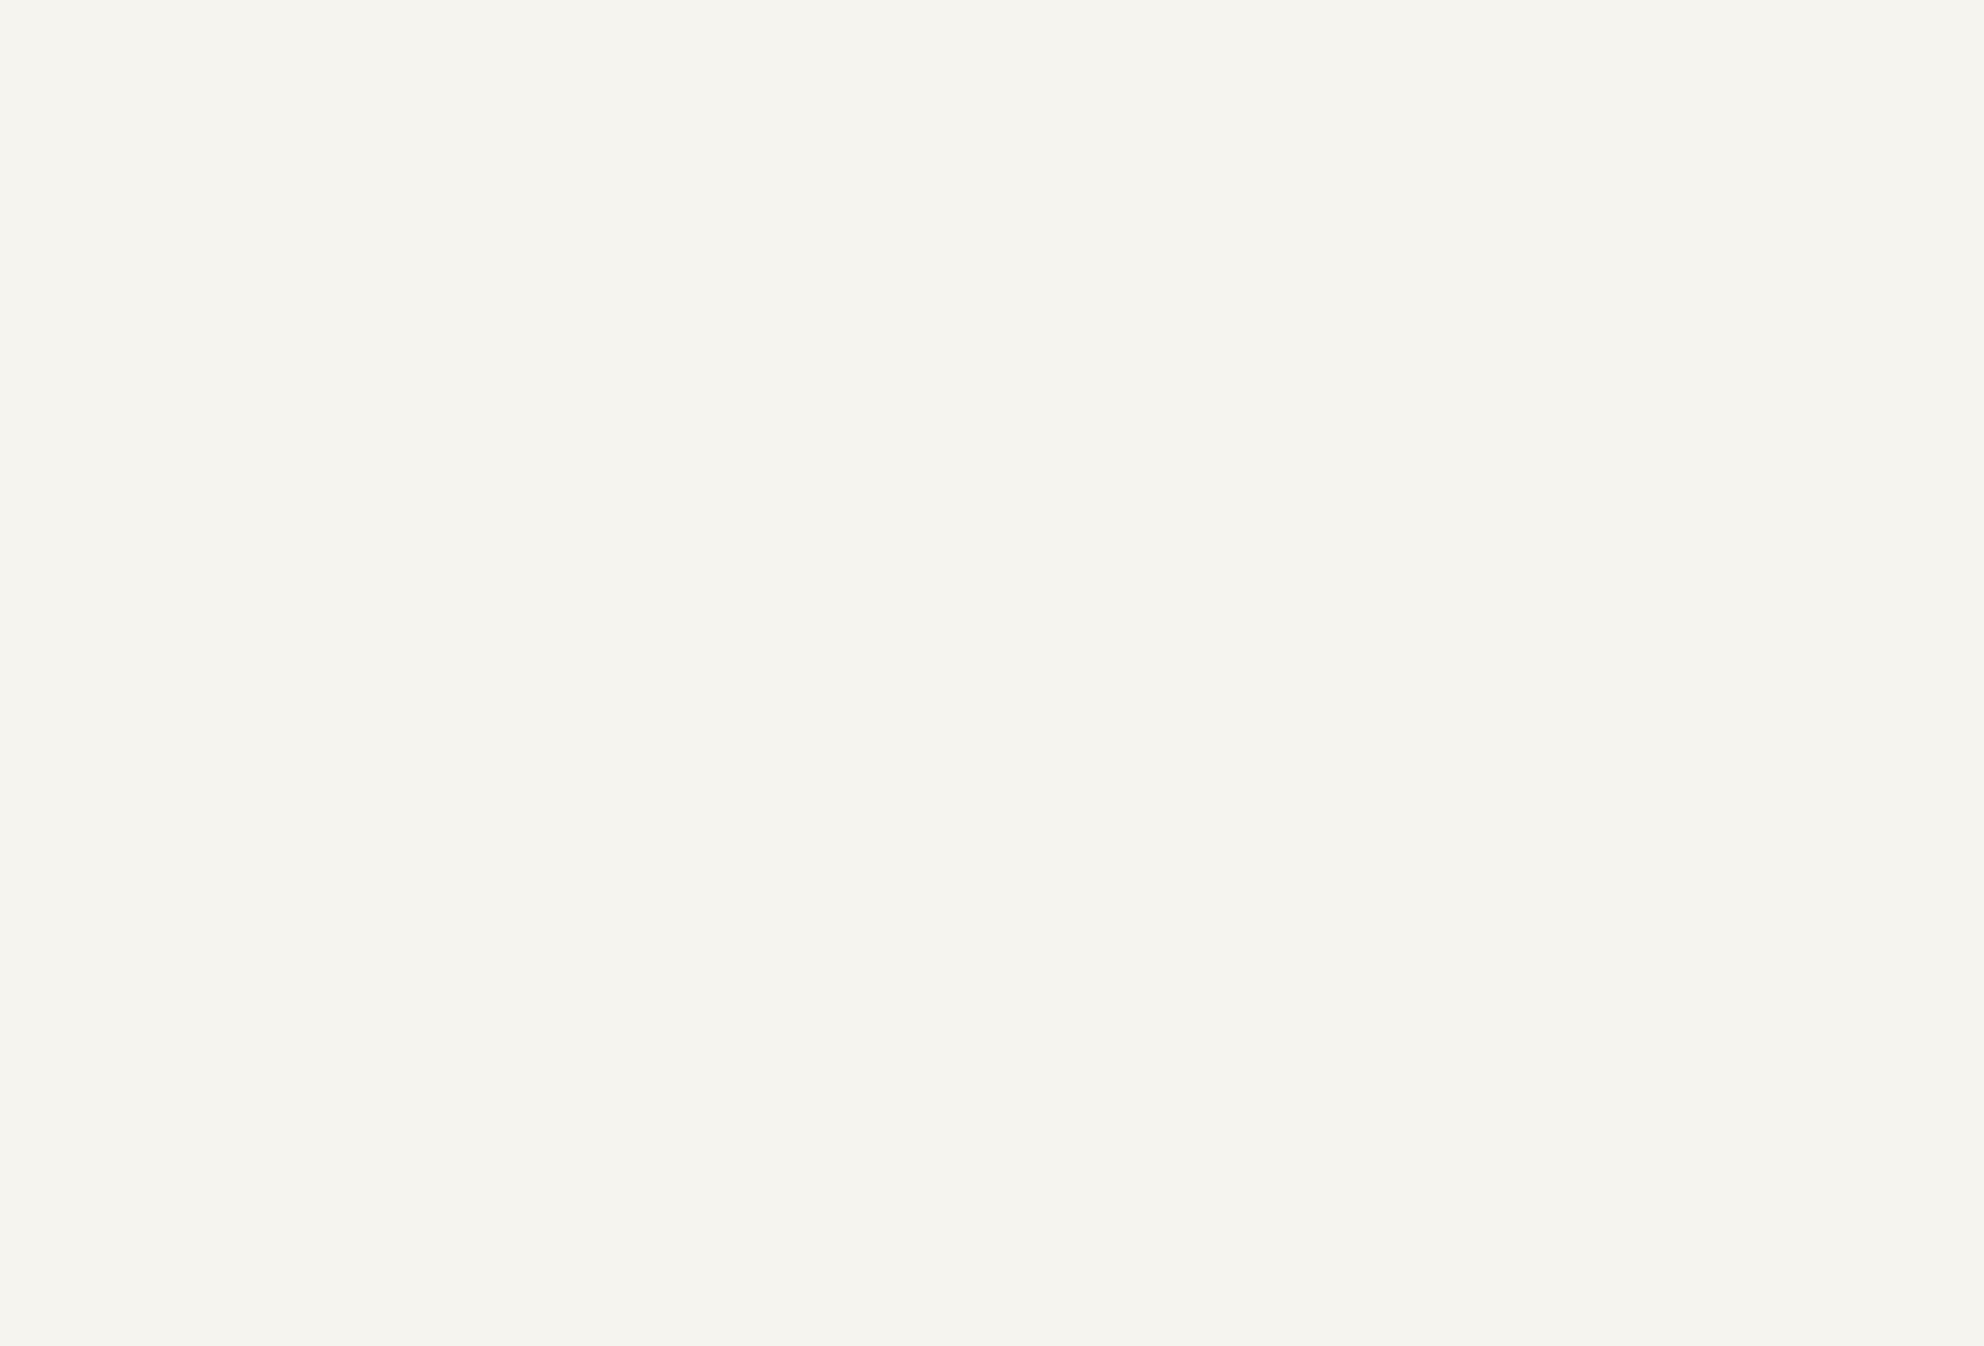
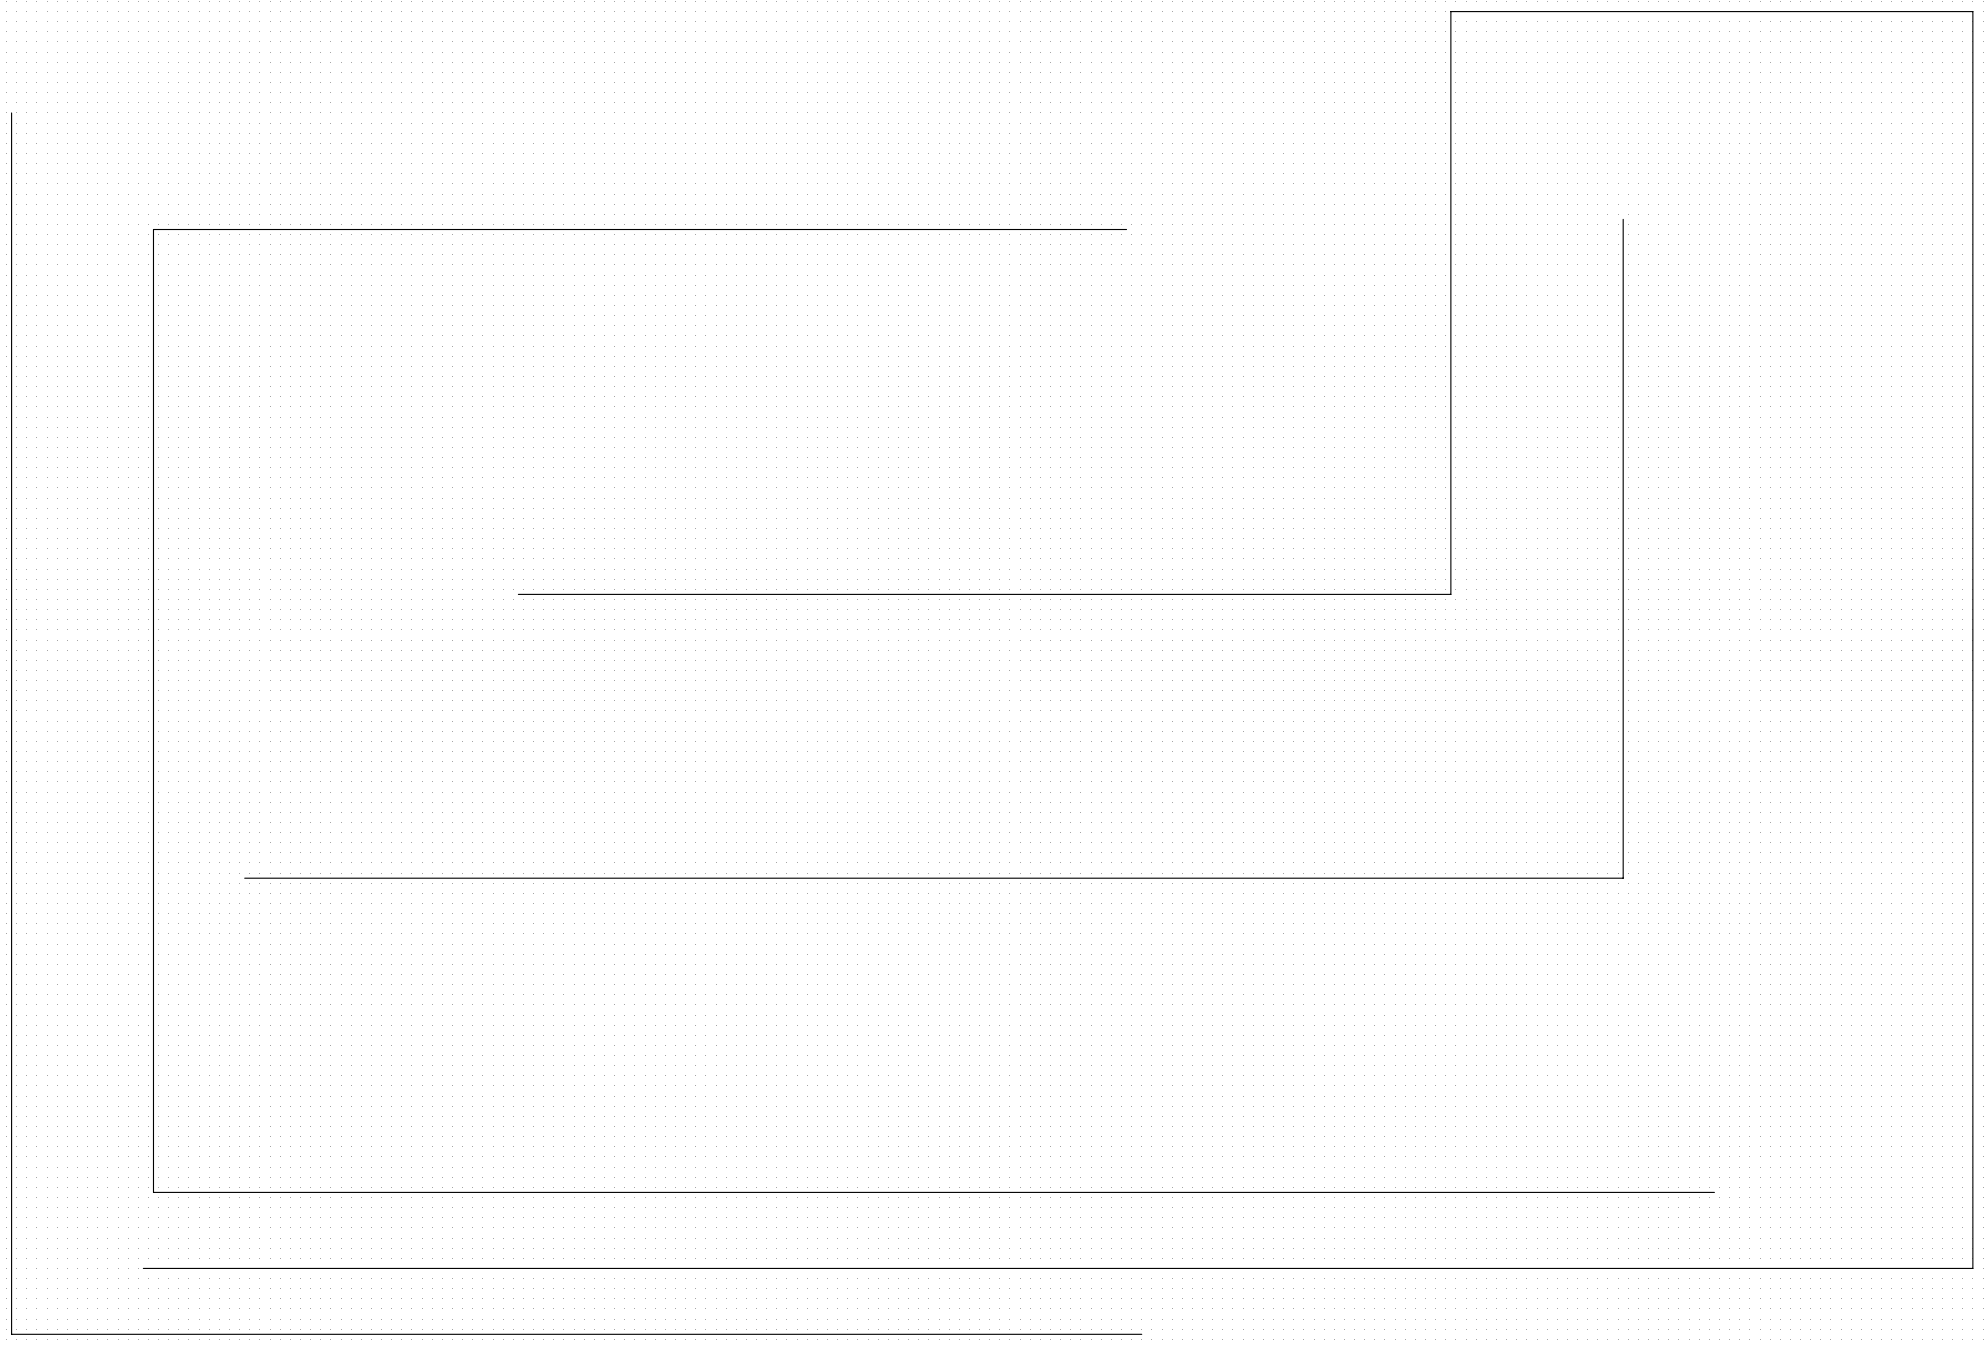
wire: none -> (11, 112) (11, 1334) (1141, 1334)
wire: none -> (1623, 219) (1623, 878) (244, 878)
wire: none -> (1126, 229) (153, 229) (153, 1192) (1714, 1192)
wire: none -> (518, 594) (1450, 594) (1450, 11) (1972, 11) (1972, 1268) (143, 1268)

